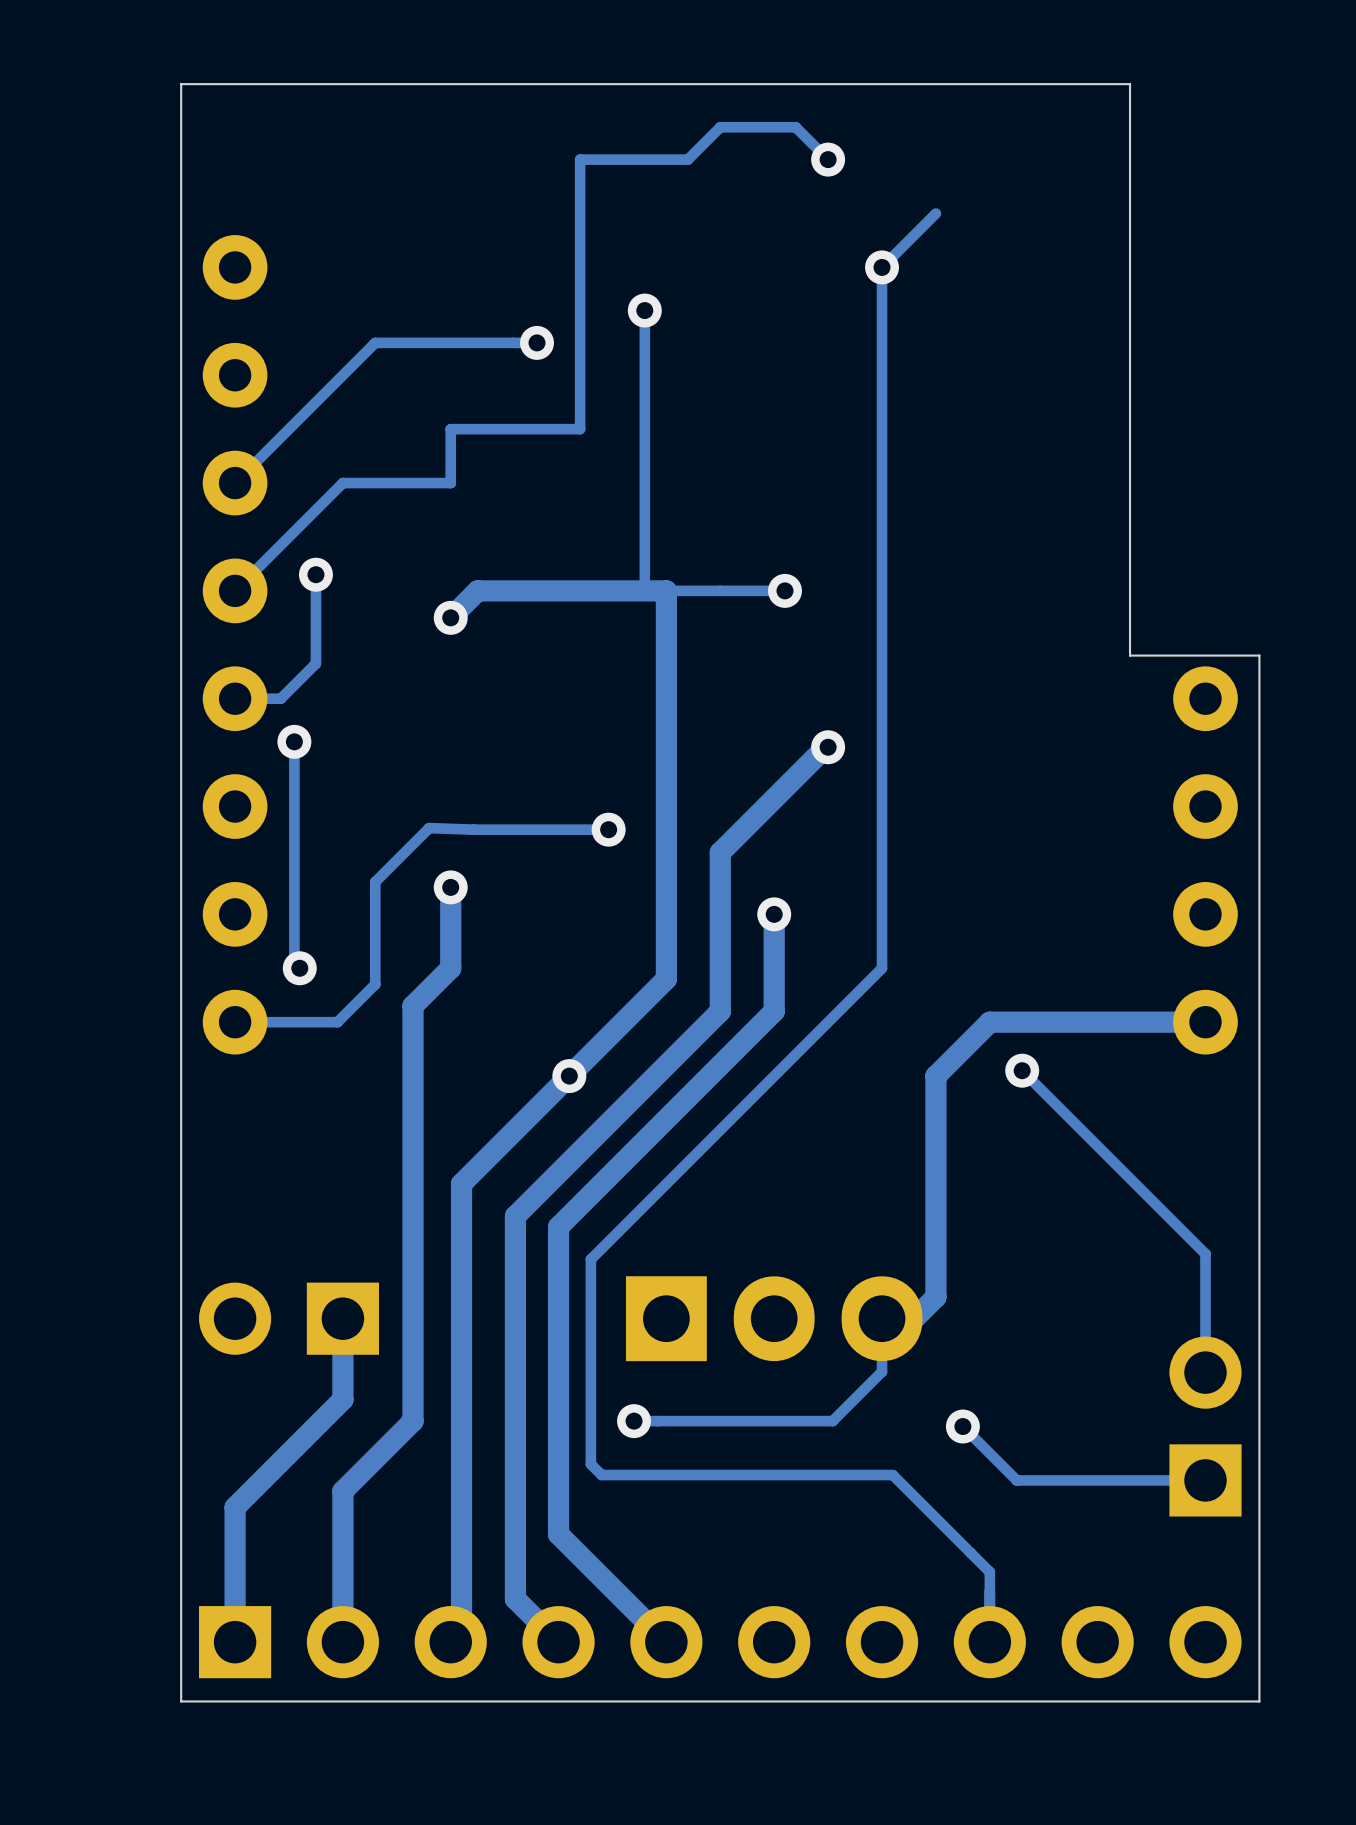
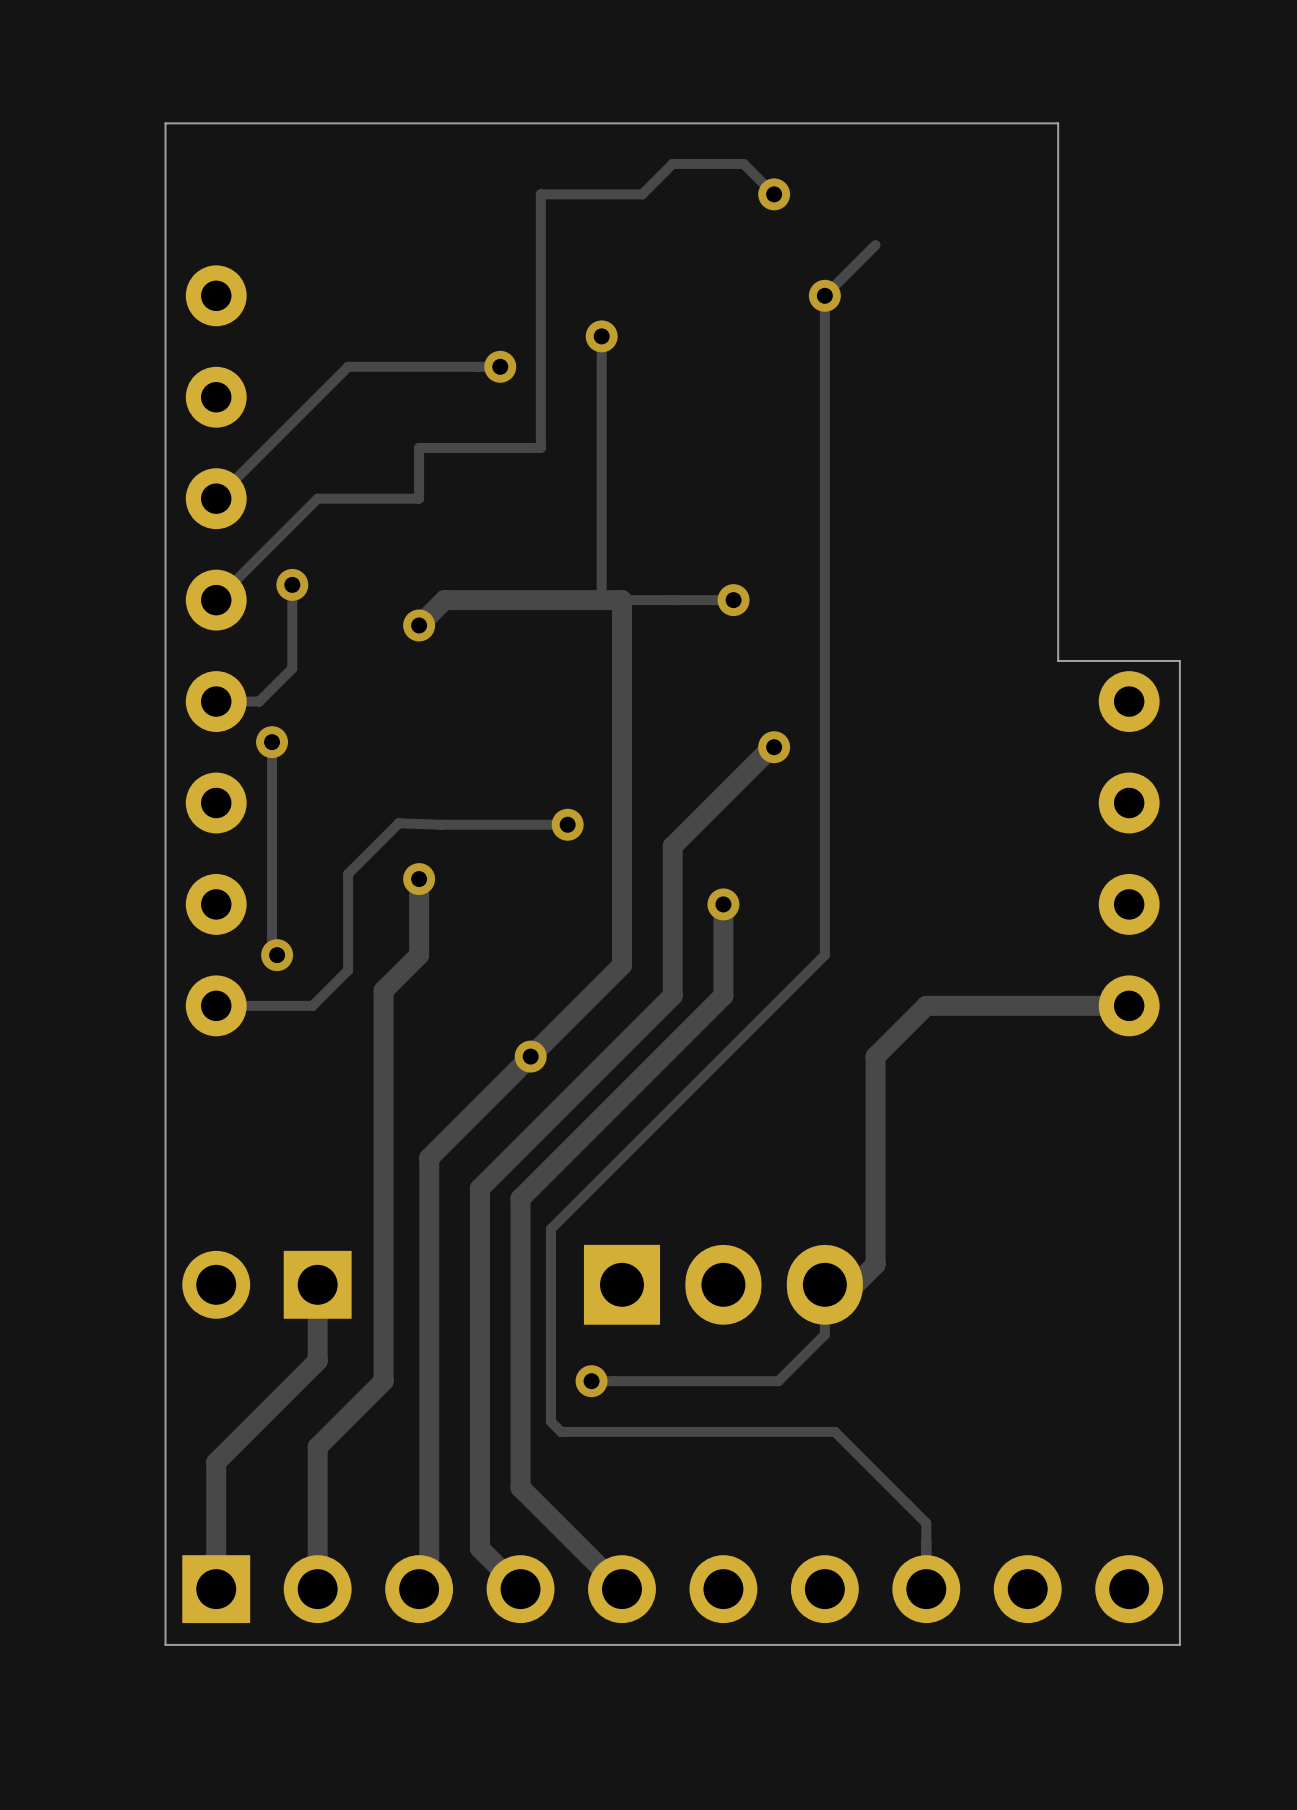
track: (1022, 1070) (1205, 1254) (1205, 1372) -> none
via: (1022, 1070) -> none
track: (962, 1426) (1016, 1480) (1205, 1480) -> none
via: (962, 1426) -> none
part: (1205, 1426) -> none

